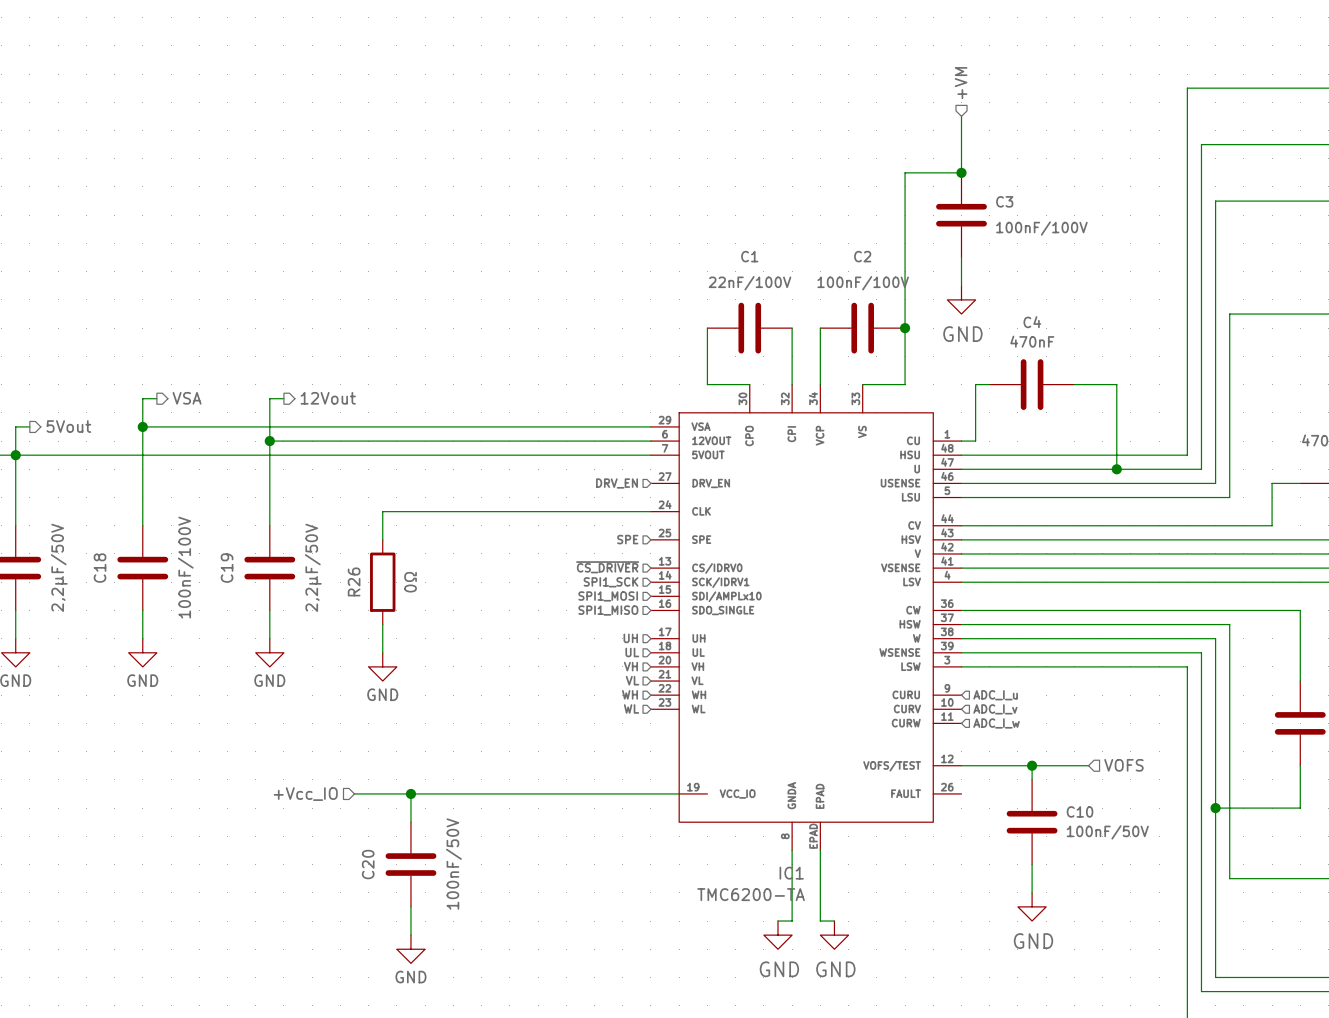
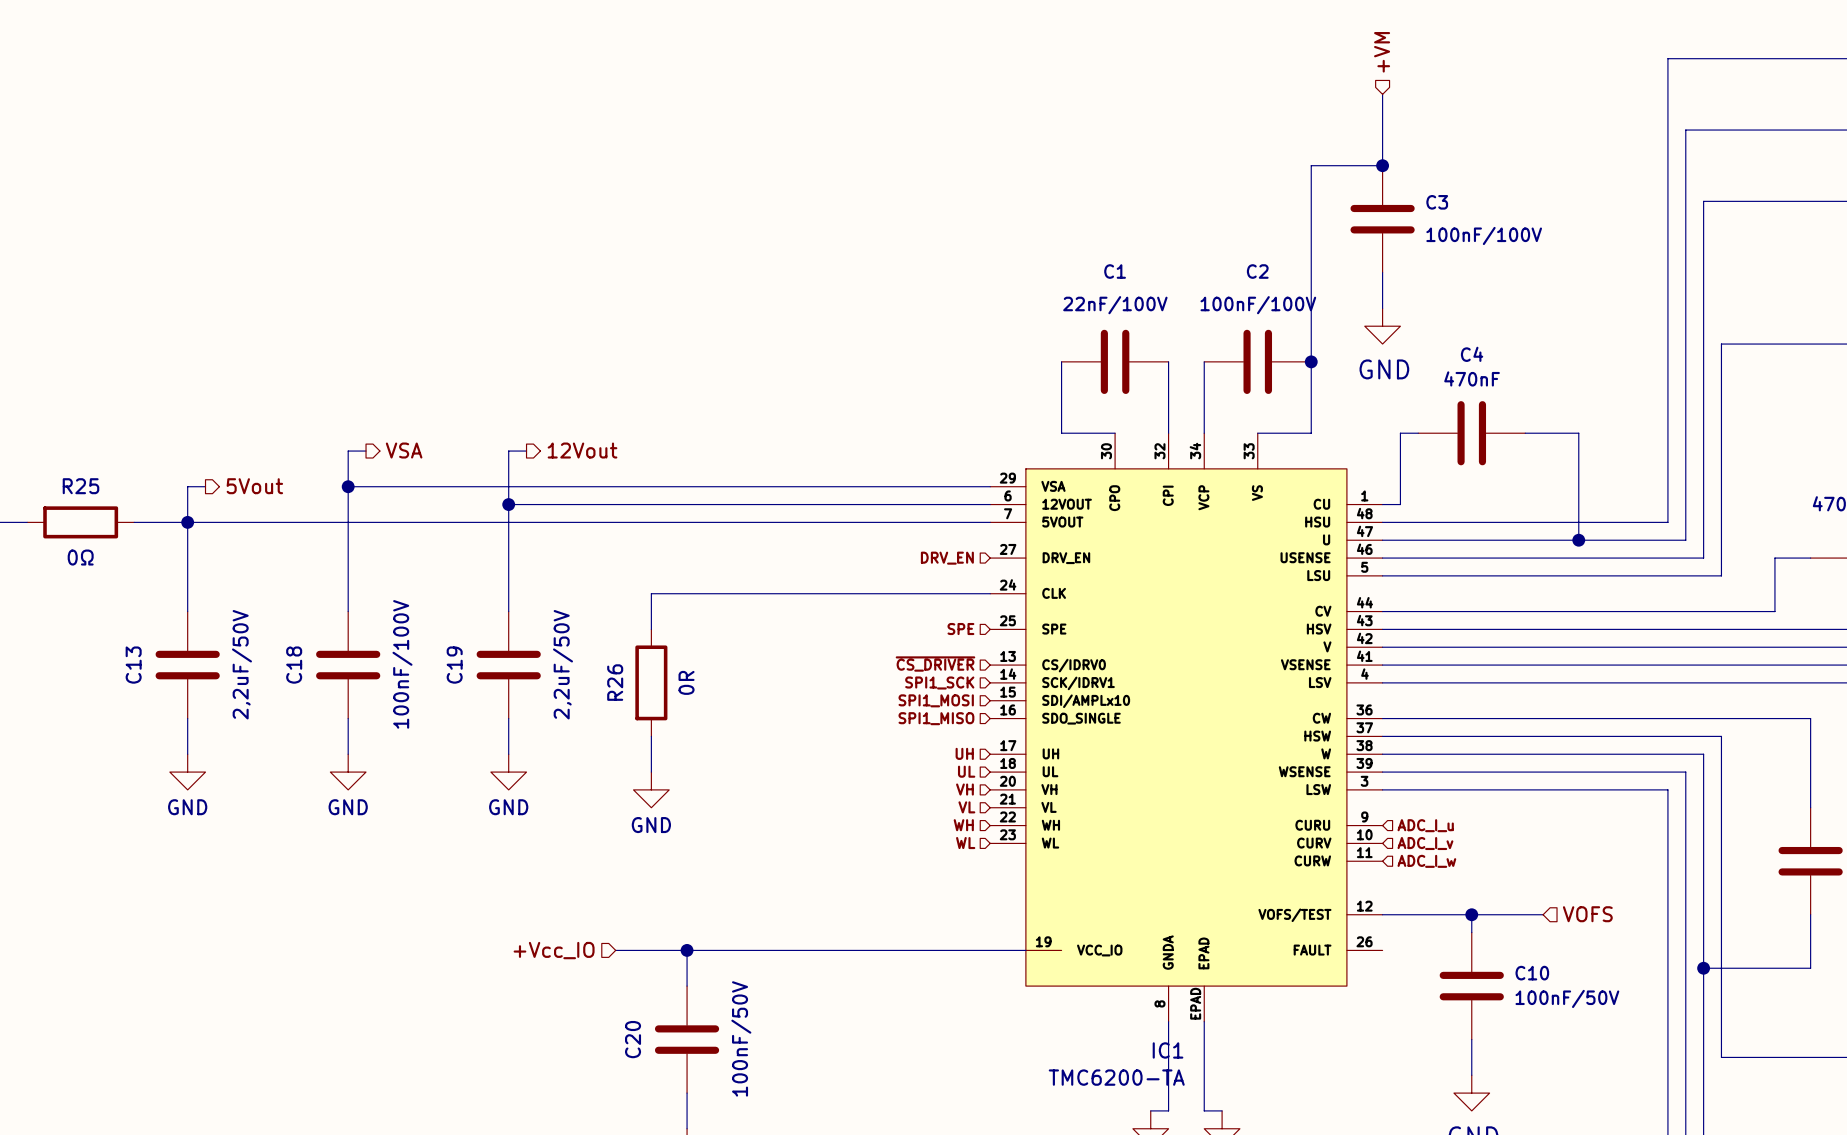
C13 value: 2,2μF/50V (59, 567) -> 2,2uF/50V (241, 664)
C19 value: 2,2μF/50V (313, 567) -> 2,2uF/50V (563, 664)
R26 value: 0Ω (410, 582) -> 0R (686, 682)

